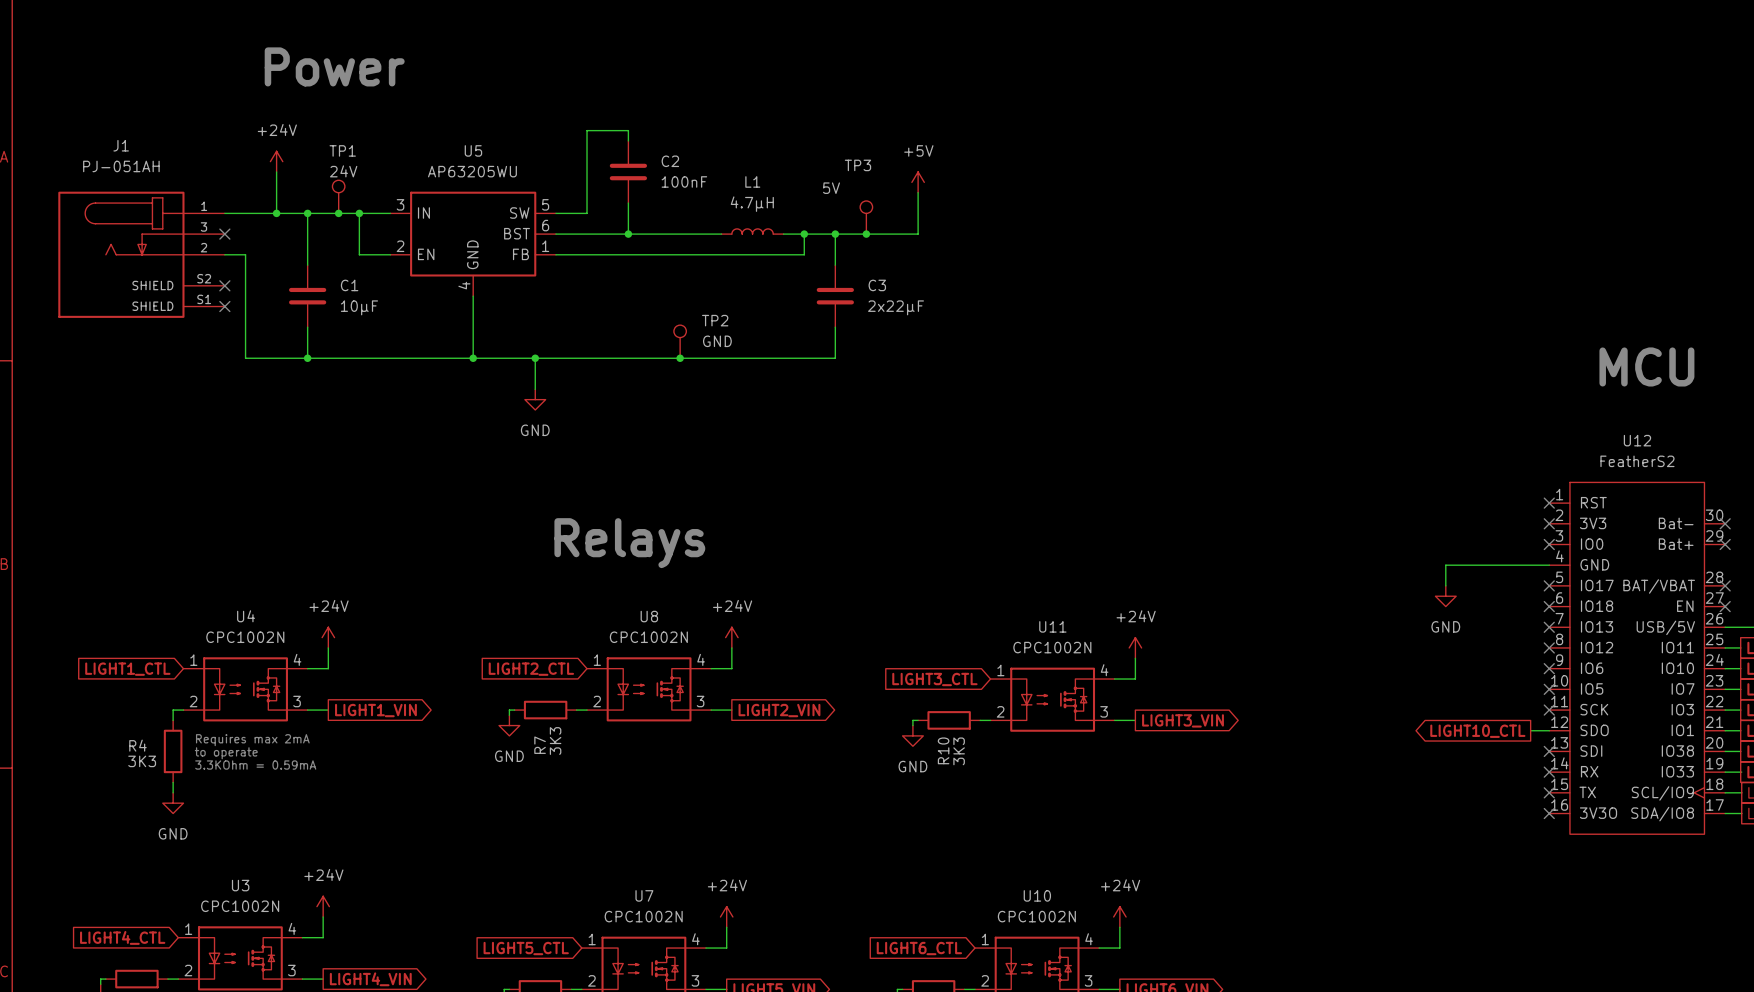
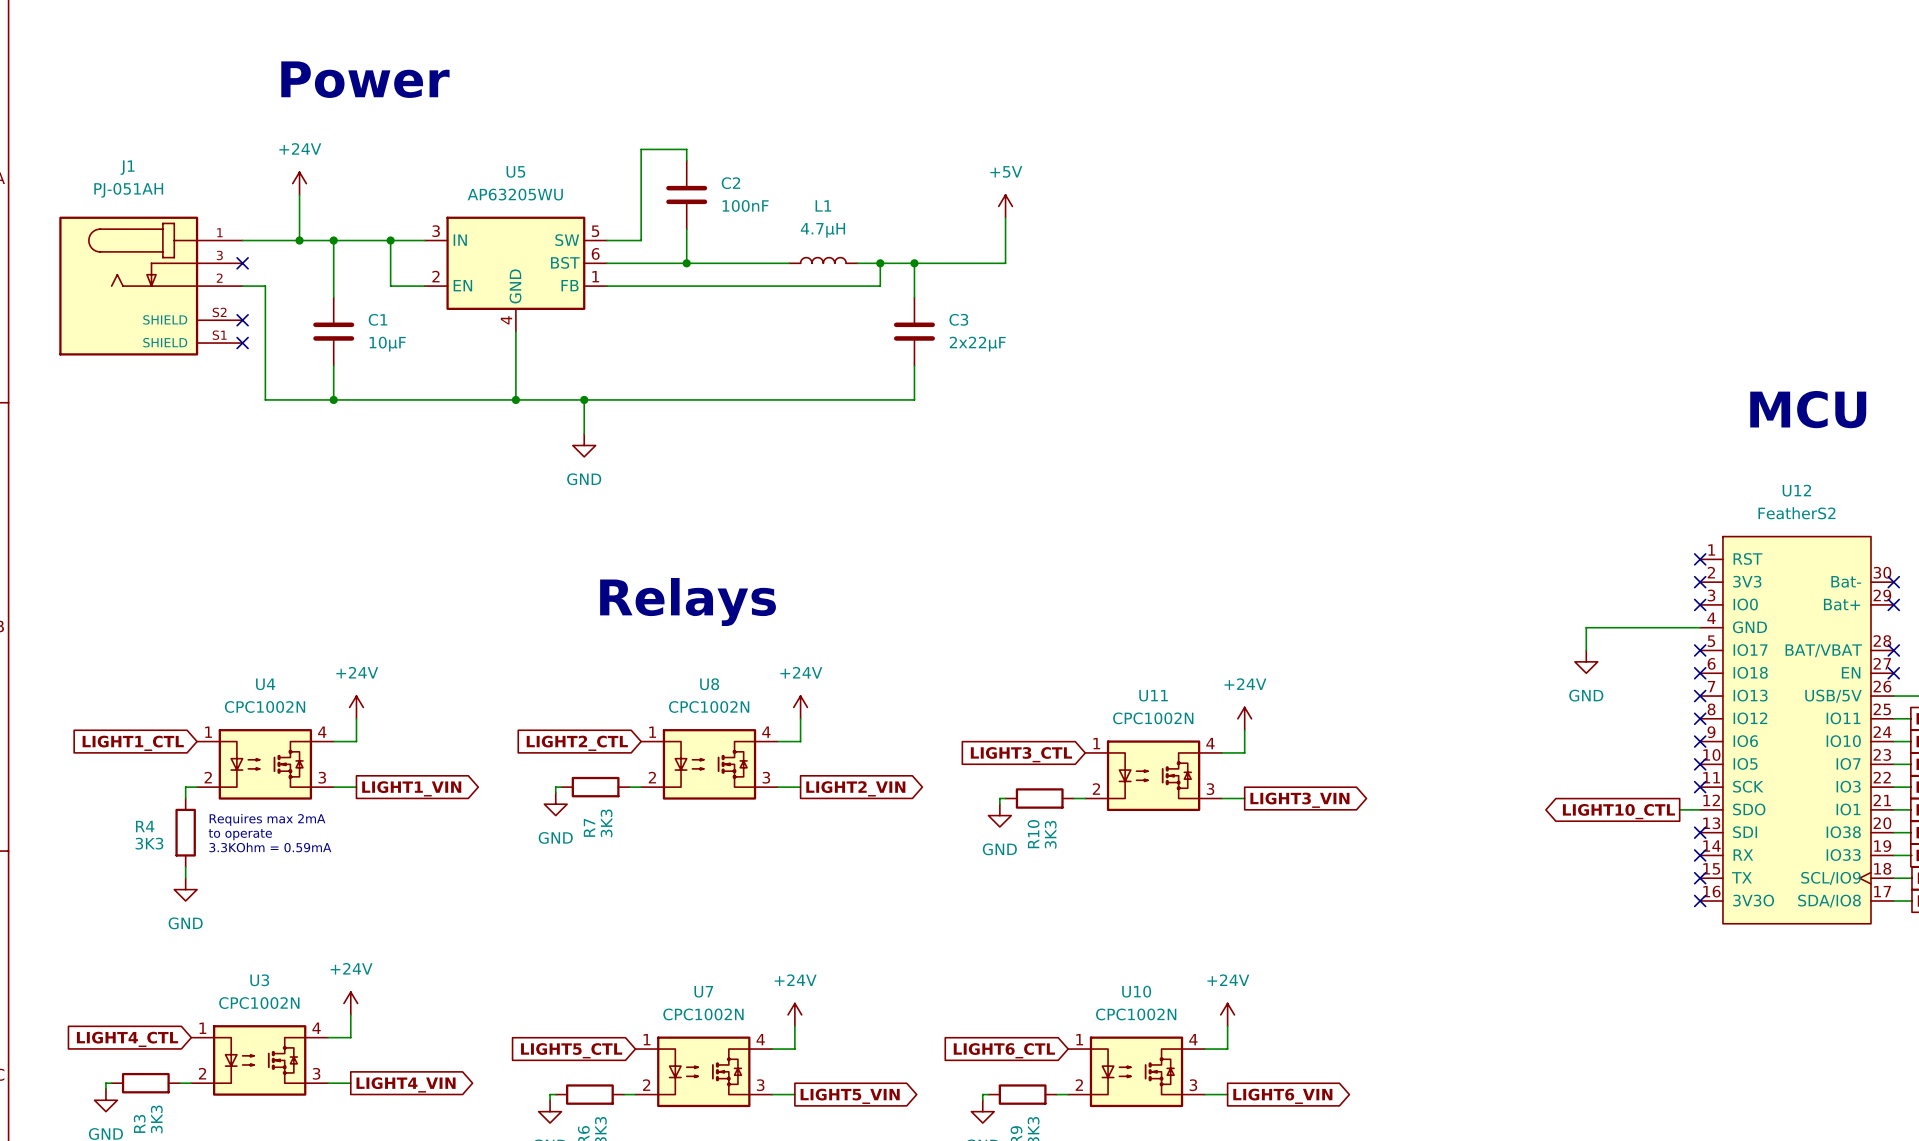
TP1: 24V (338, 196) -> none
junction: (338, 213) -> none
TP3: 5V (866, 217) -> none
junction: (866, 234) -> none
TP2: GND (680, 341) -> none
junction: (680, 358) -> none

